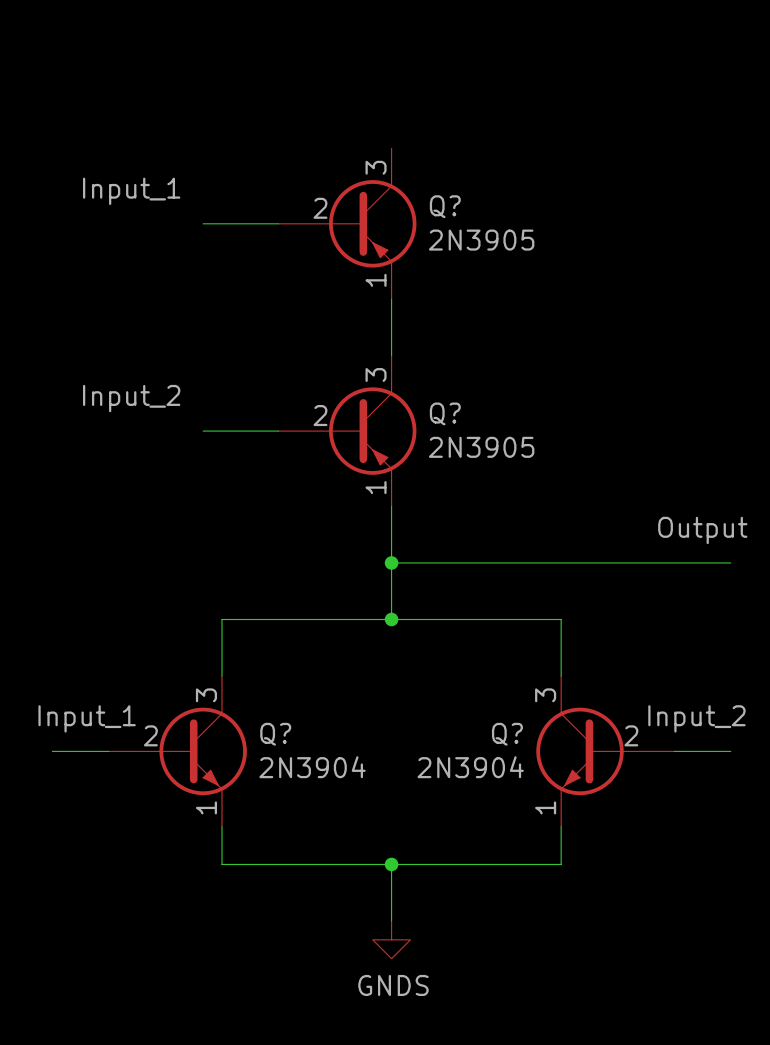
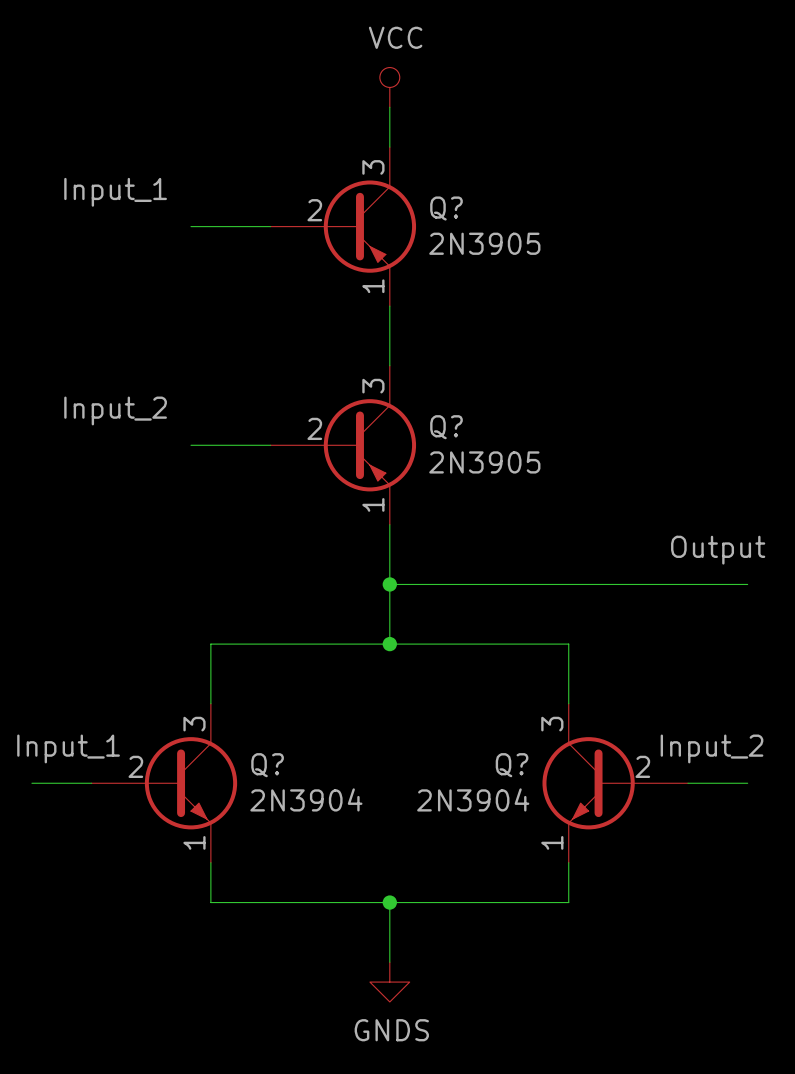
power symbol: none -> VCC (389, 87)
wire: none -> (389, 107) (389, 147)

